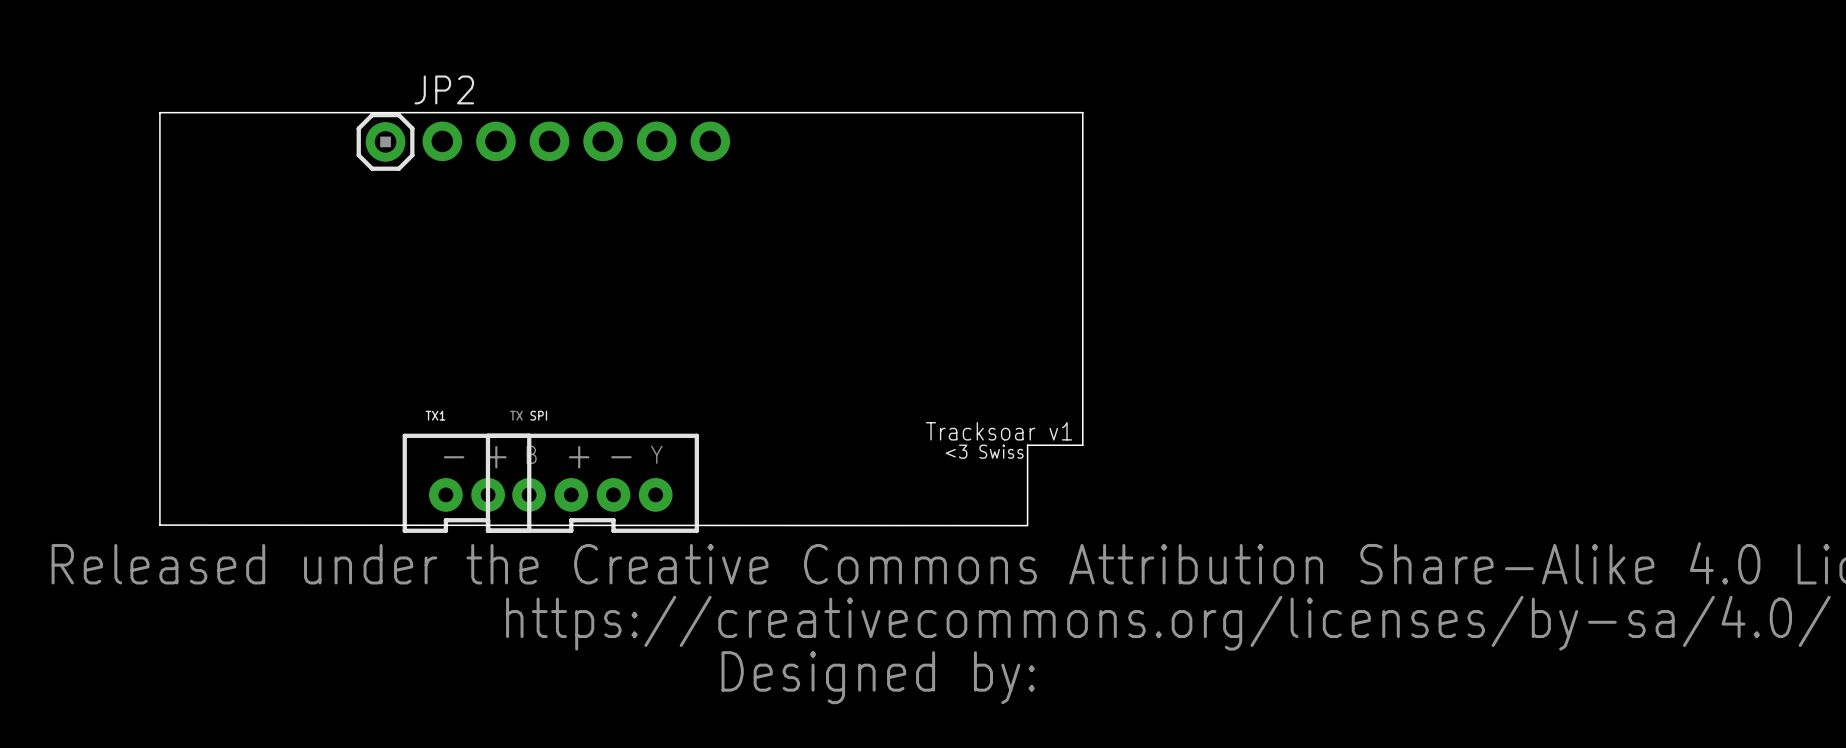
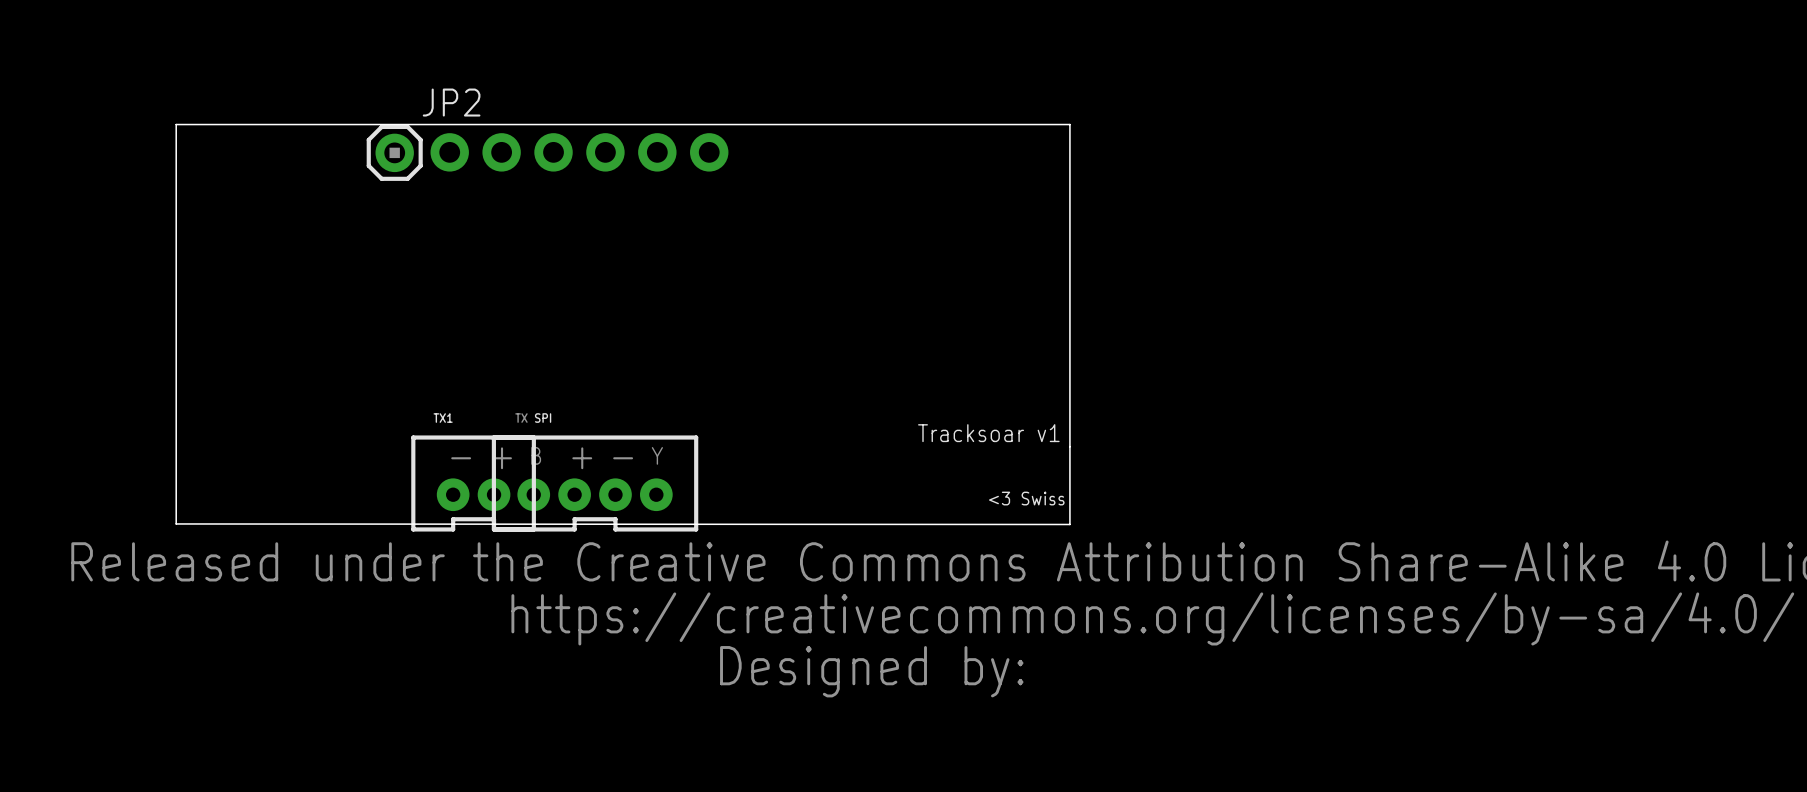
board edge: (1082, 445) (1027, 445) (1027, 525) -> (1069, 446) (1069, 524) (1016, 524)
text position: <3 Swiss (984, 451) -> <3 Swiss (1026, 498)

